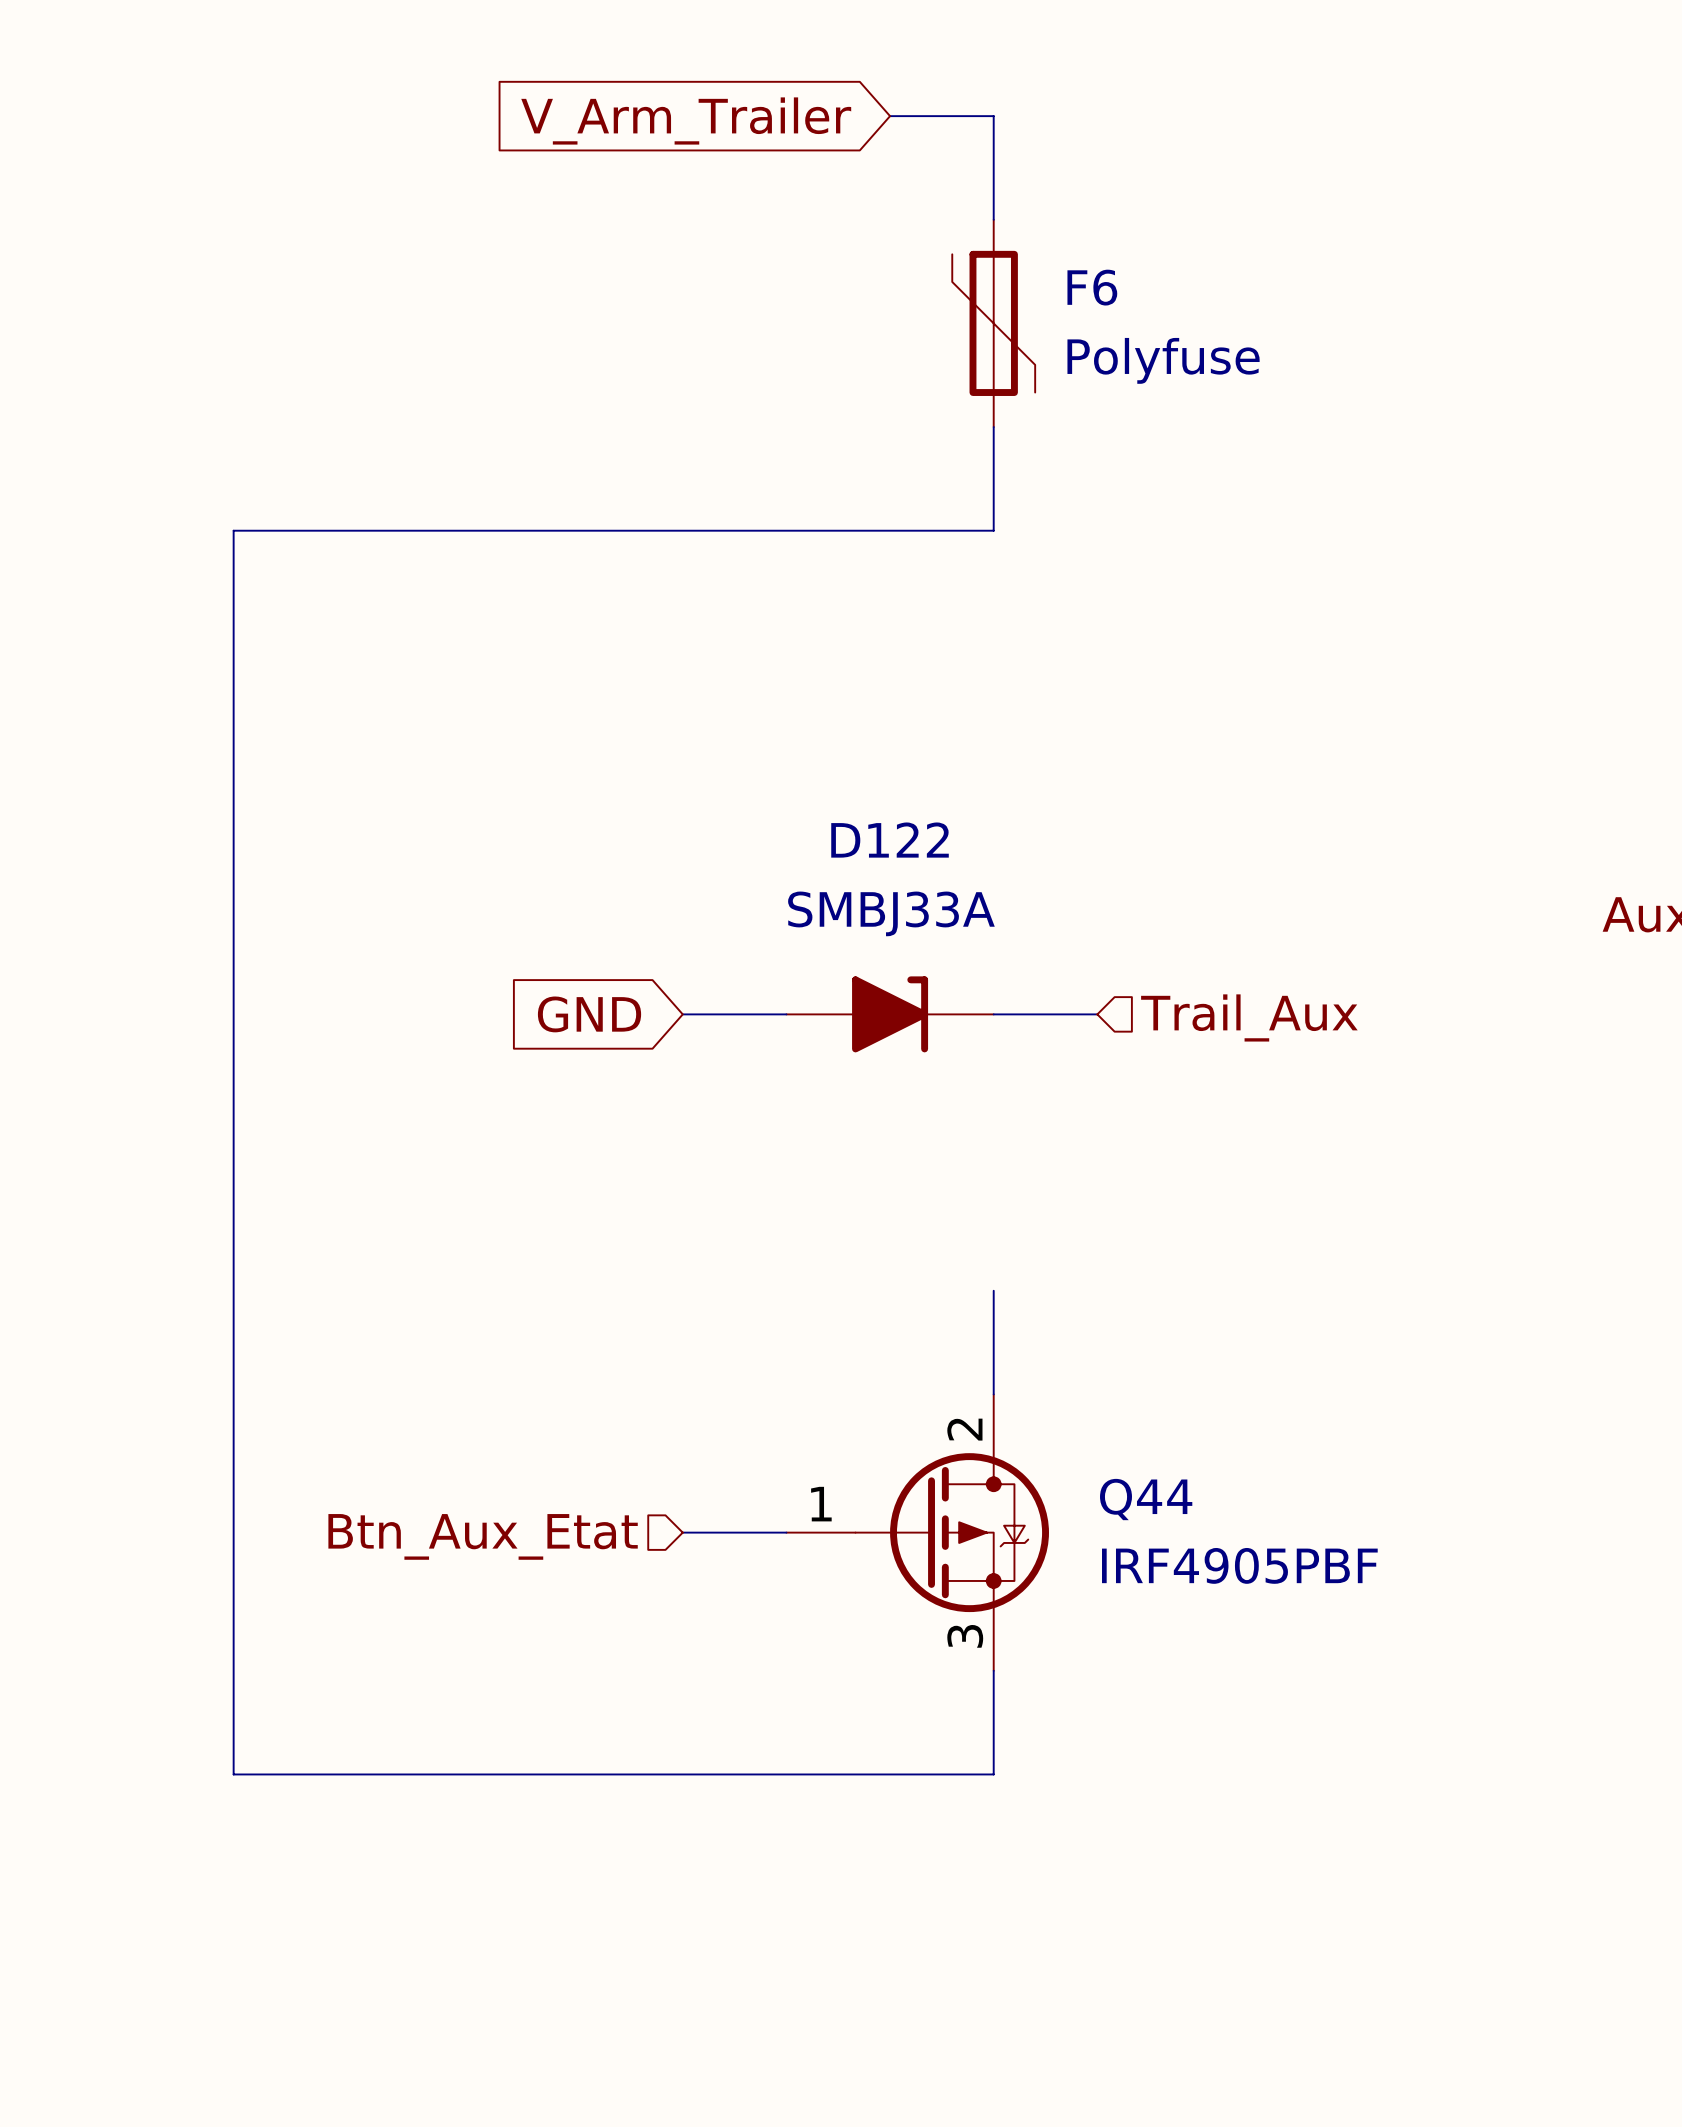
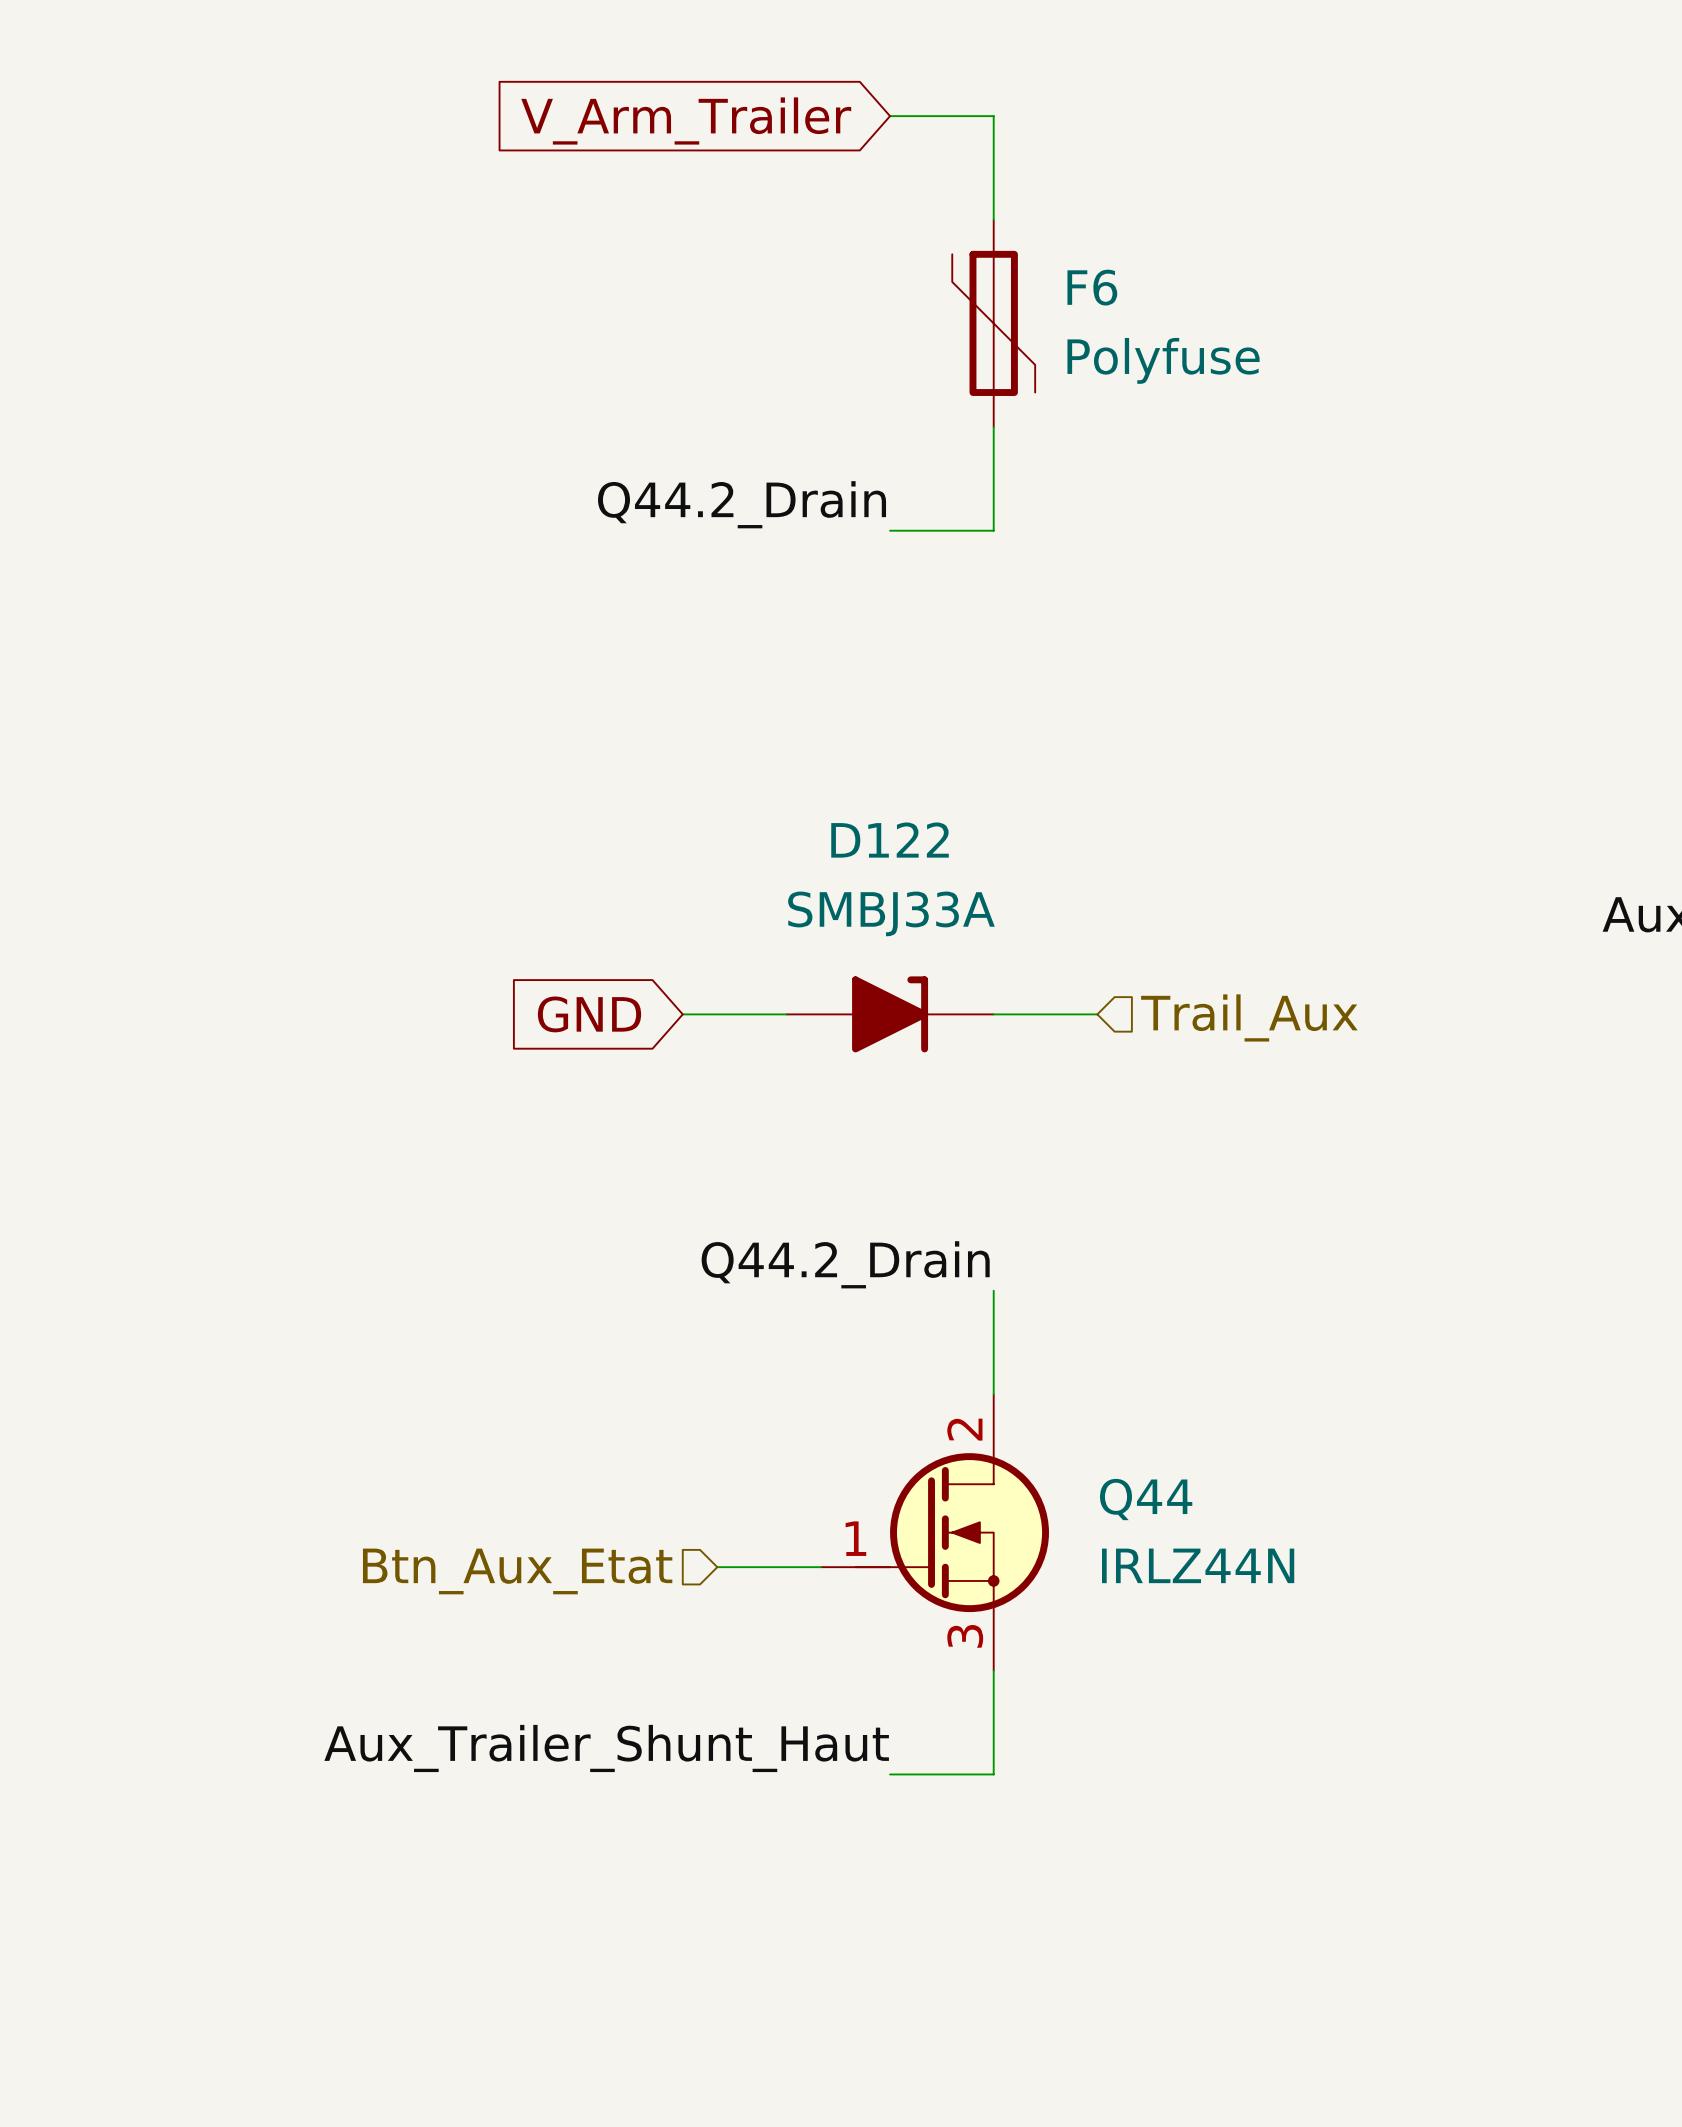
label: none -> Q44.2_Drain (742, 504)
wire: (890, 530) (233, 530) (233, 1774) (890, 1774) -> none
label: none -> Q44.2_Drain (845, 1264)
Q44 symbol: [786, 1394, 1049, 1671] -> [820, 1394, 1049, 1671]
wire: (682, 1532) (786, 1532) -> (717, 1567) (820, 1567)
hierarchical label position: Btn_Aux_Etat (483, 1536) -> Btn_Aux_Etat (517, 1571)
Q44 value: IRF4905PBF (1239, 1565) -> IRLZ44N (1198, 1565)
label: none -> Aux_Trailer_Shunt_Haut (606, 1748)

